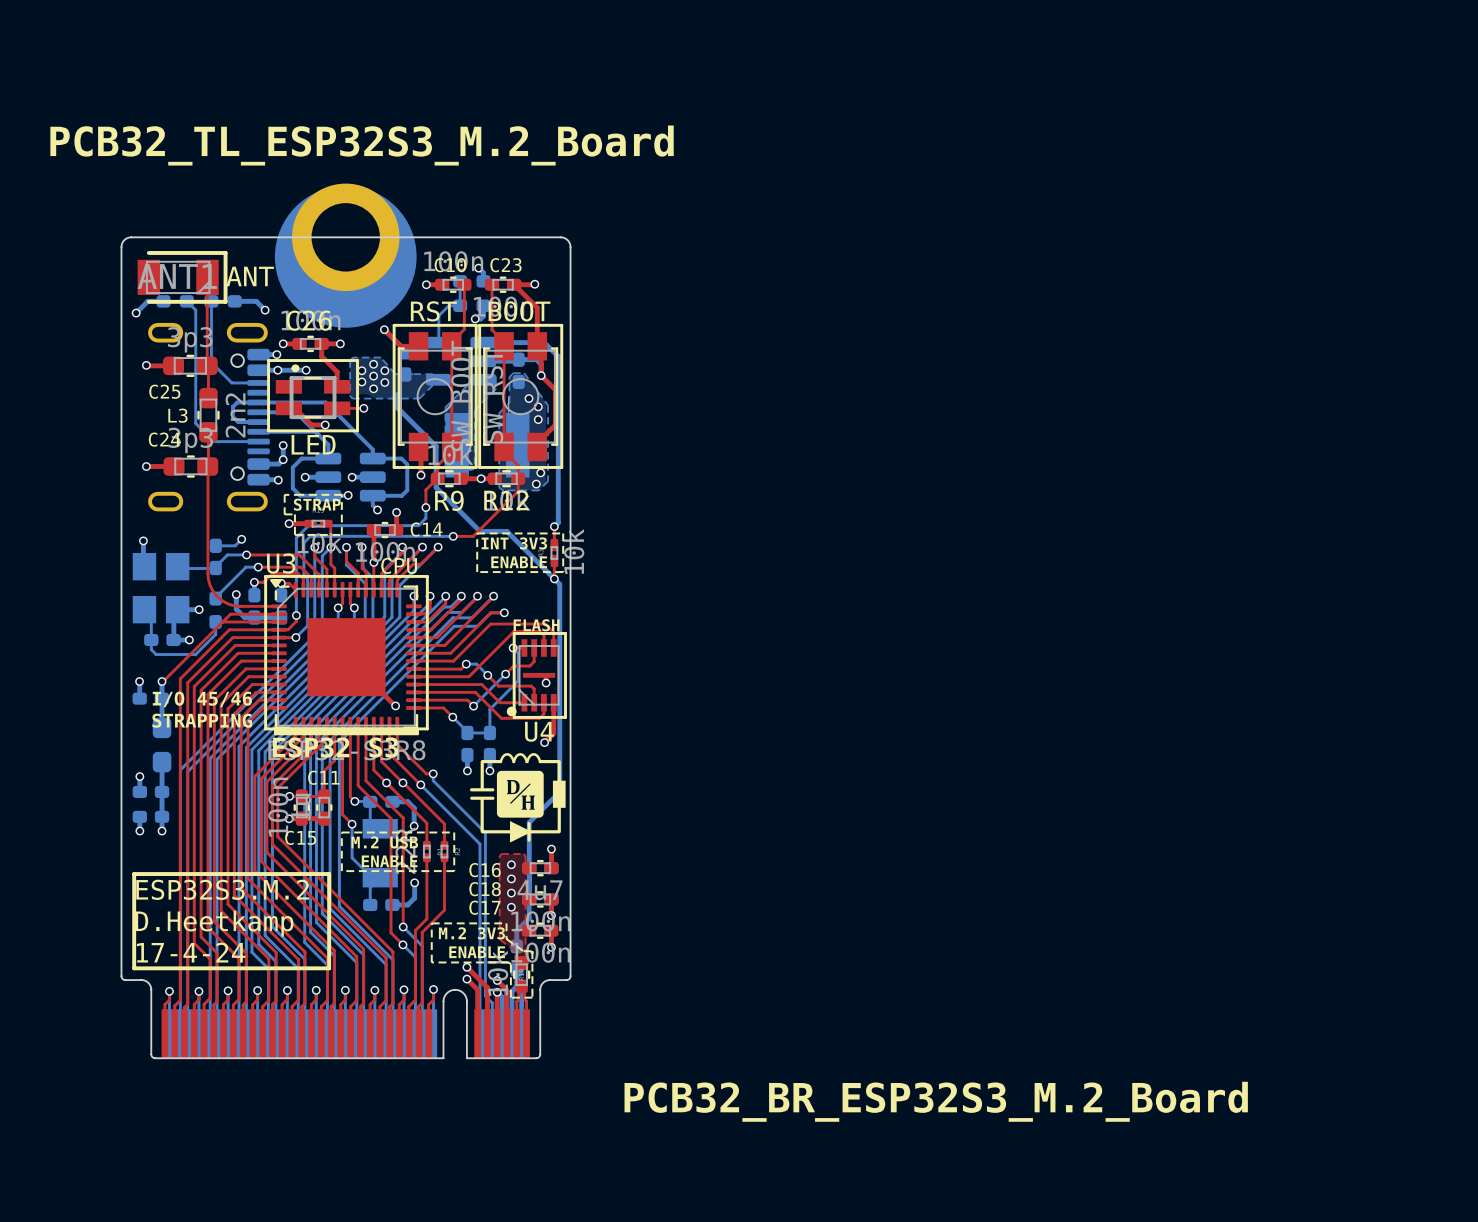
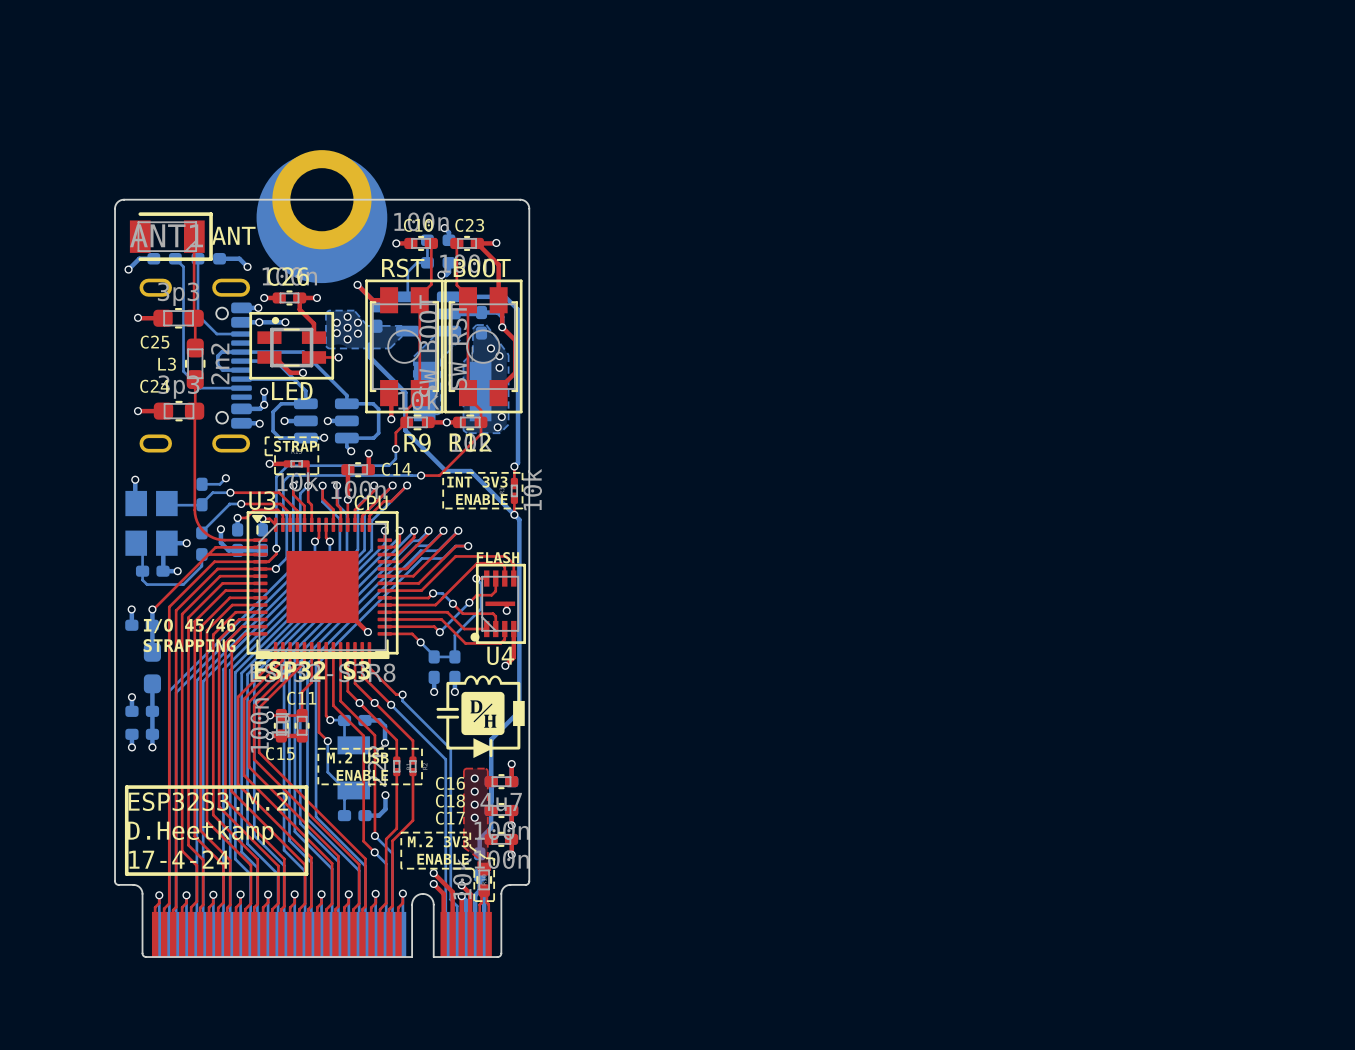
text: PCB32_TL_ESP32S3_M.2_Board (362, 145) -> none
text: PCB32_BR_ESP32S3_M.2_Board (936, 1101) -> none

